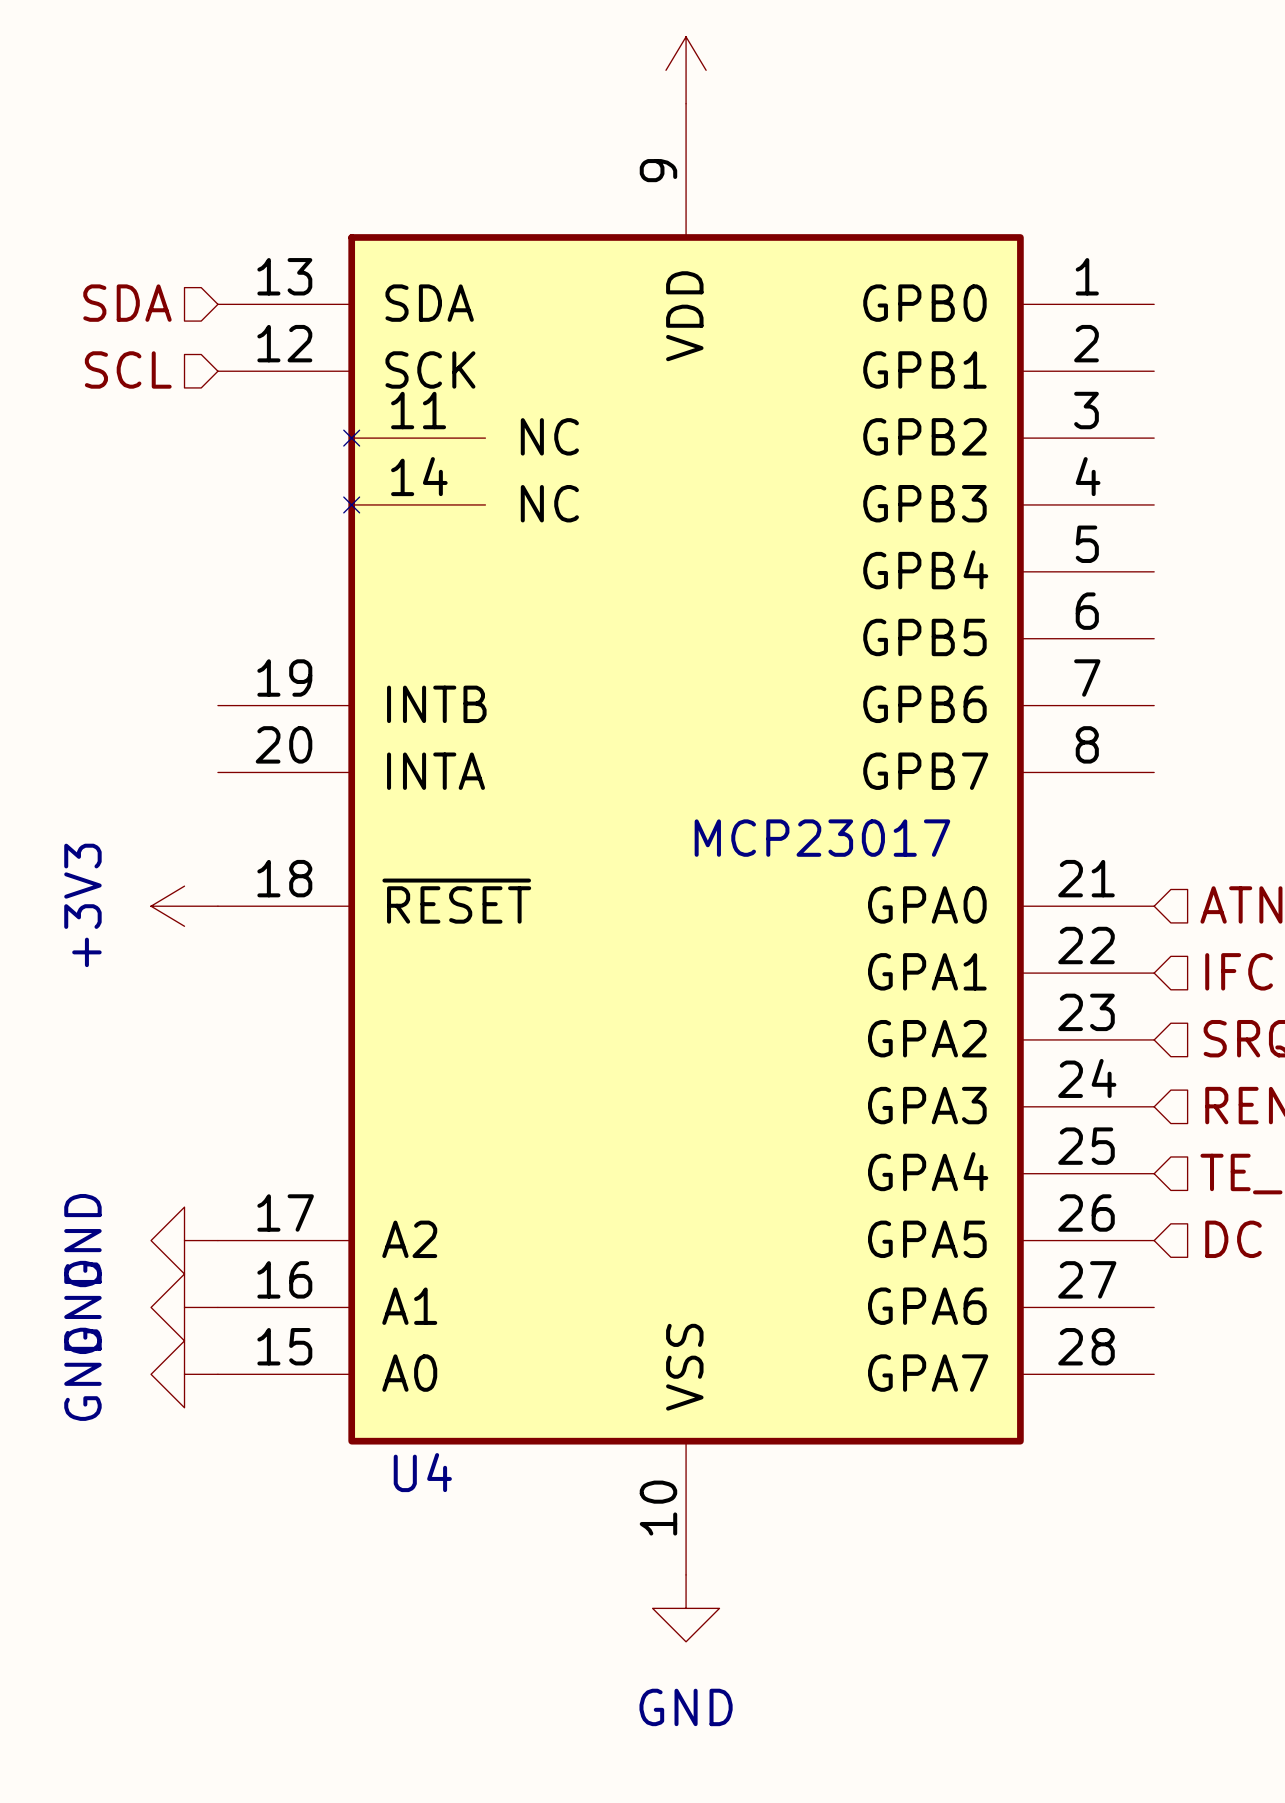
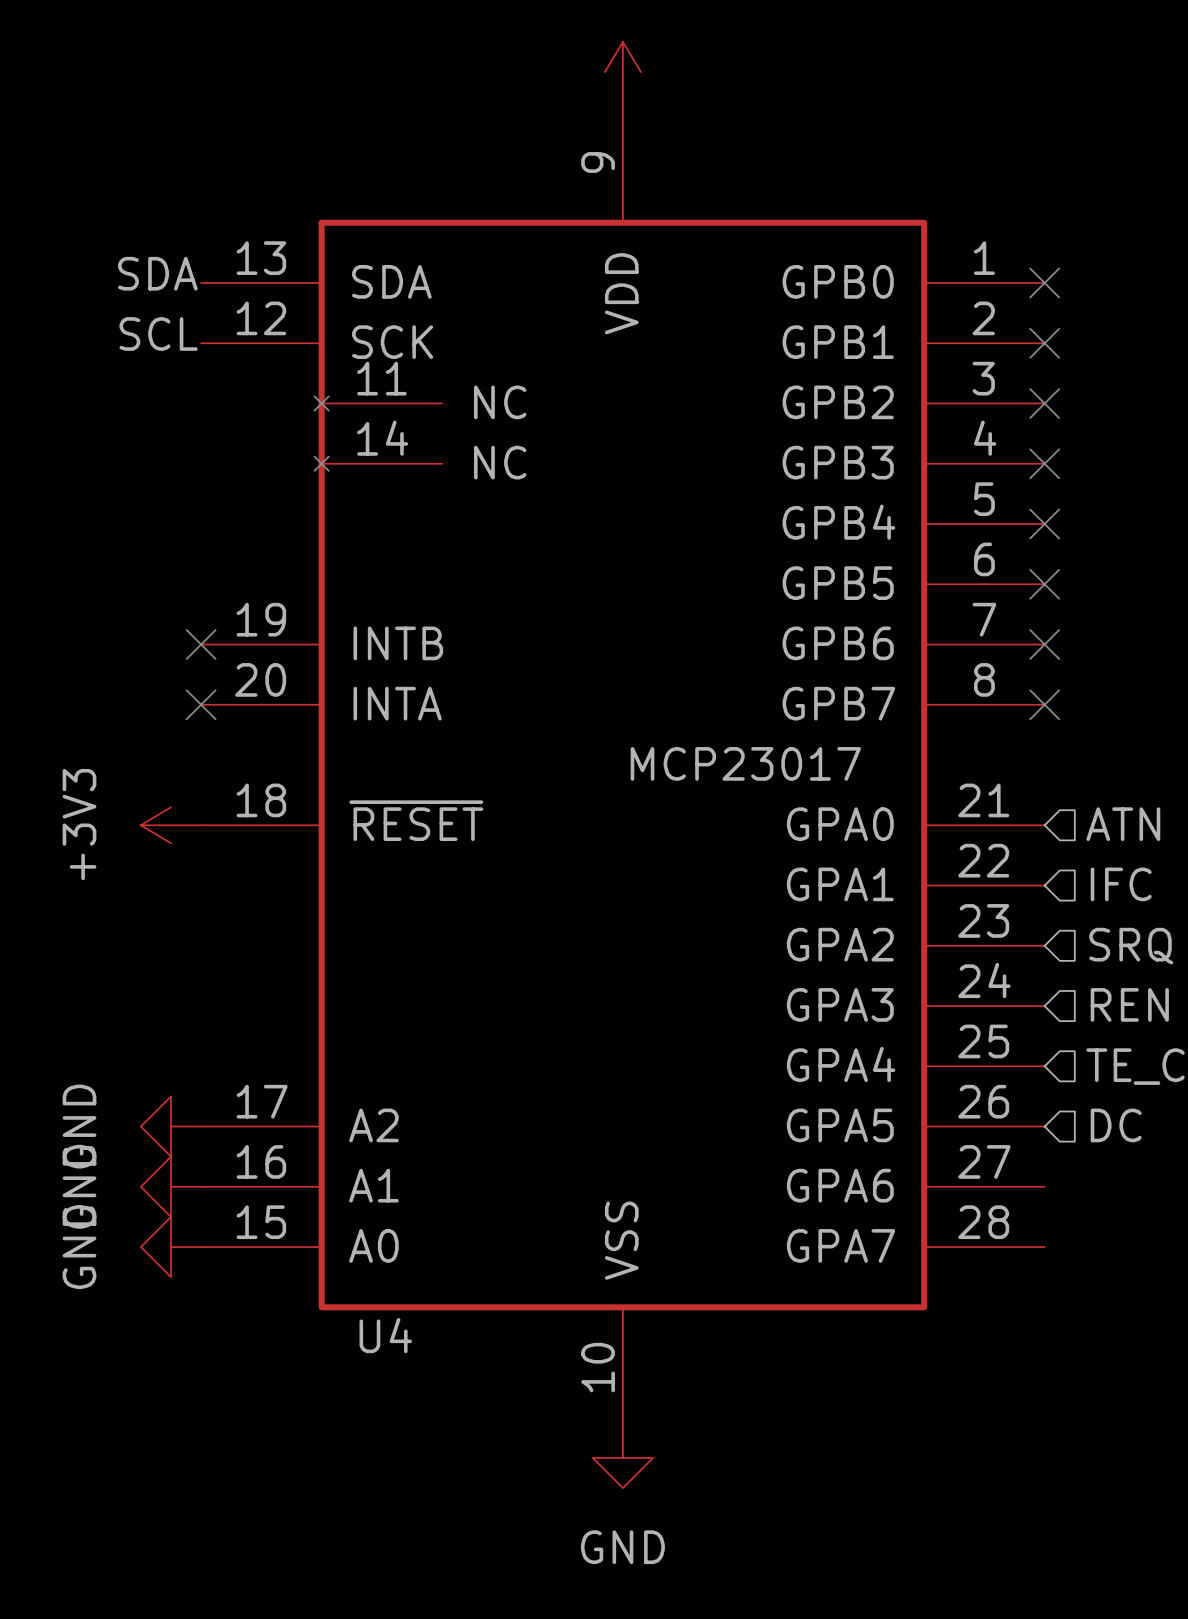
label: none -> SDA (157, 273)
hierarchical label: SDA (127, 303) -> none
no-connect mark: none -> (1044, 283)
label: none -> SCL (158, 333)
hierarchical label: SCL (128, 369) -> none
no-connect mark: none -> (1044, 343)
no-connect mark: none -> (1044, 403)
no-connect mark: none -> (1044, 463)
no-connect mark: none -> (1044, 524)
no-connect mark: none -> (1044, 584)
no-connect mark: none -> (201, 644)
no-connect mark: none -> (1044, 644)
no-connect mark: none -> (201, 704)
no-connect mark: none -> (1044, 704)

